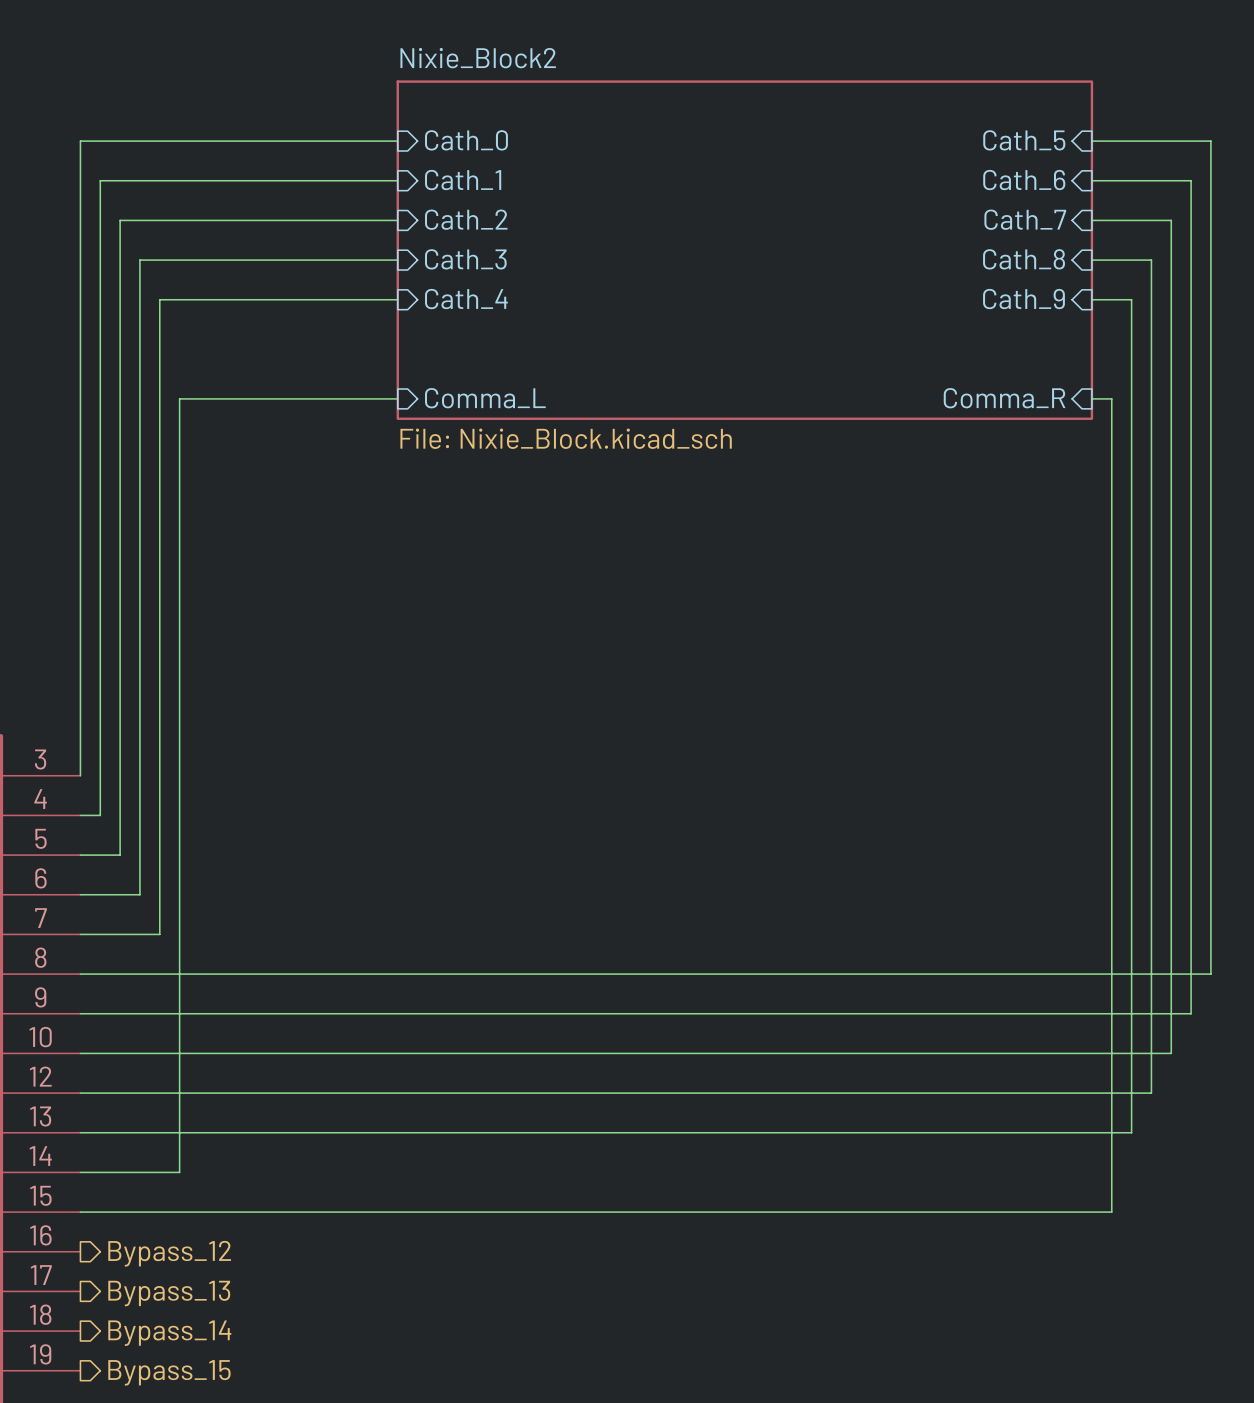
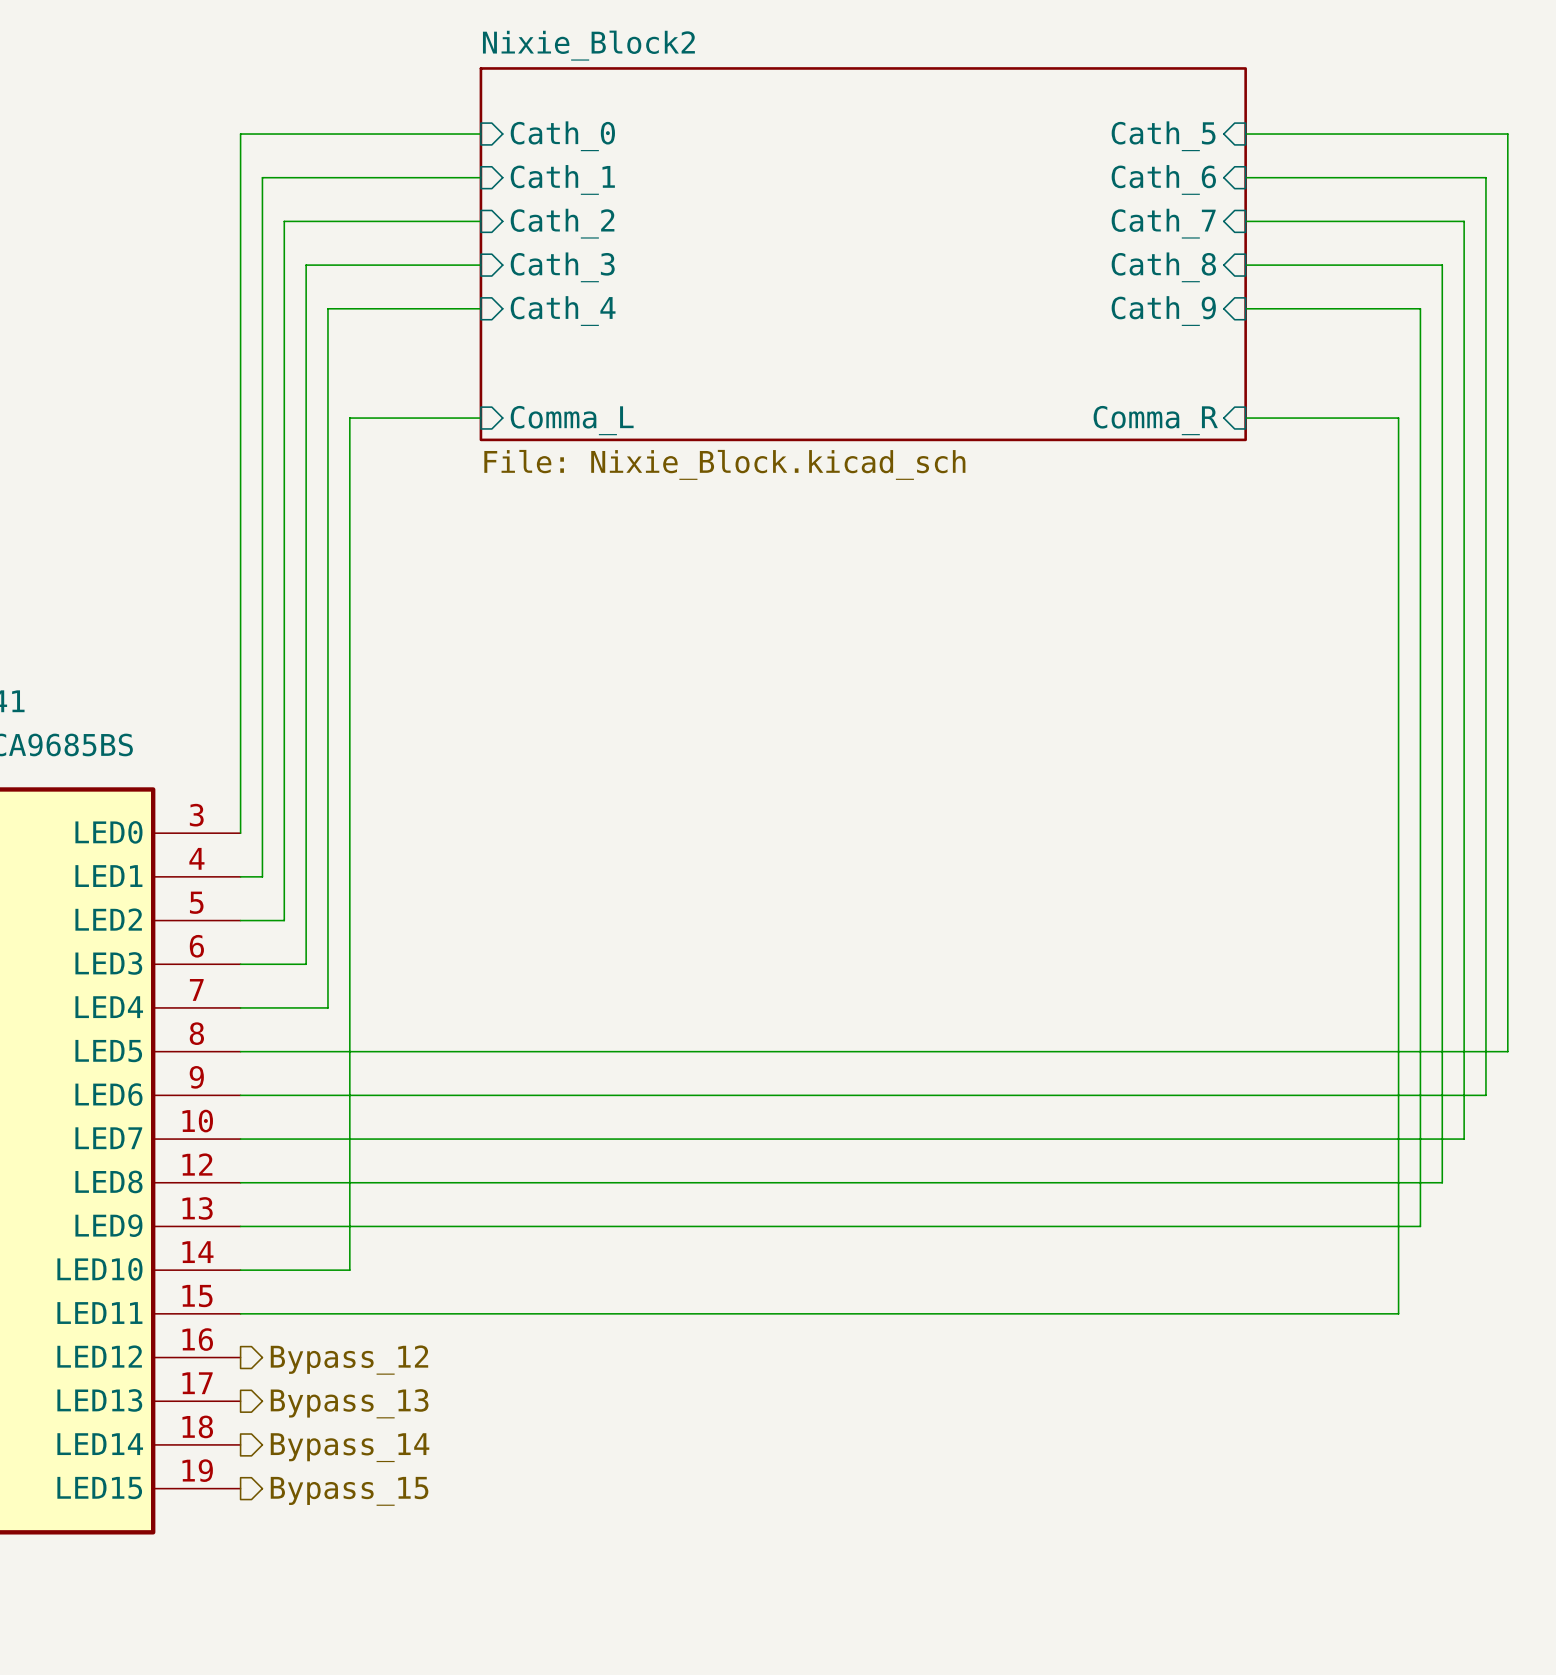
sheet pin position: Cath_0 (466, 140) -> Cath_0 (562, 136)
sheet pin position: Cath_5 (1024, 140) -> Cath_5 (1163, 136)
wire: (298, 141) (397, 141) -> none
wire: none -> (1245, 134) (1354, 134)
wire: (1210, 141) (1210, 180) -> (1464, 177) (1485, 177)
wire: (298, 180) (397, 180) -> none
sheet pin position: Cath_1 (463, 180) -> Cath_1 (562, 179)
wire: none -> (1245, 177) (1354, 177)
sheet pin position: Cath_6 (1024, 180) -> Cath_6 (1163, 179)
wire: (1191, 180) (1191, 220) -> none
sheet pin position: Cath_2 (466, 219) -> Cath_2 (562, 223)
sheet pin position: Cath_7 (1025, 219) -> Cath_7 (1163, 223)
wire: (298, 220) (397, 220) -> none
wire: none -> (1245, 221) (1354, 221)
wire: (1171, 220) (1171, 260) -> (1442, 221) (1464, 221)
sheet Nixie_Block2 position: (744, 250) -> (863, 254)
sheet pin position: Cath_3 (465, 259) -> Cath_3 (562, 267)
sheet pin position: Cath_8 (1024, 259) -> Cath_8 (1163, 267)
wire: (298, 260) (397, 260) -> none
wire: none -> (1245, 265) (1354, 265)
wire: (1151, 260) (1151, 299) -> (1420, 265) (1442, 265)
wire: (298, 299) (397, 299) -> none
sheet pin position: Cath_4 (466, 299) -> Cath_4 (563, 311)
wire: none -> (1245, 308) (1354, 308)
sheet pin position: Cath_9 (1023, 299) -> Cath_9 (1163, 311)
wire: (1131, 299) (1131, 398) -> (1376, 418) (1398, 418)
wire: none -> (1398, 308) (1420, 308)
wire: (298, 398) (397, 398) -> none
sheet pin position: Comma_L (485, 398) -> Comma_L (572, 420)
wire: none -> (1245, 418) (1354, 418)
sheet pin position: Comma_R (1004, 398) -> Comma_R (1155, 420)
wire: (1111, 398) (1111, 1212) -> (1485, 134) (1507, 134) (1507, 1051) (1485, 1051) (1485, 1095) (1464, 1095) (1464, 1139) (1442, 1139) (1442, 1182) (1420, 1182) (1420, 1226) (1398, 1226) (1398, 1313) (1376, 1313)

